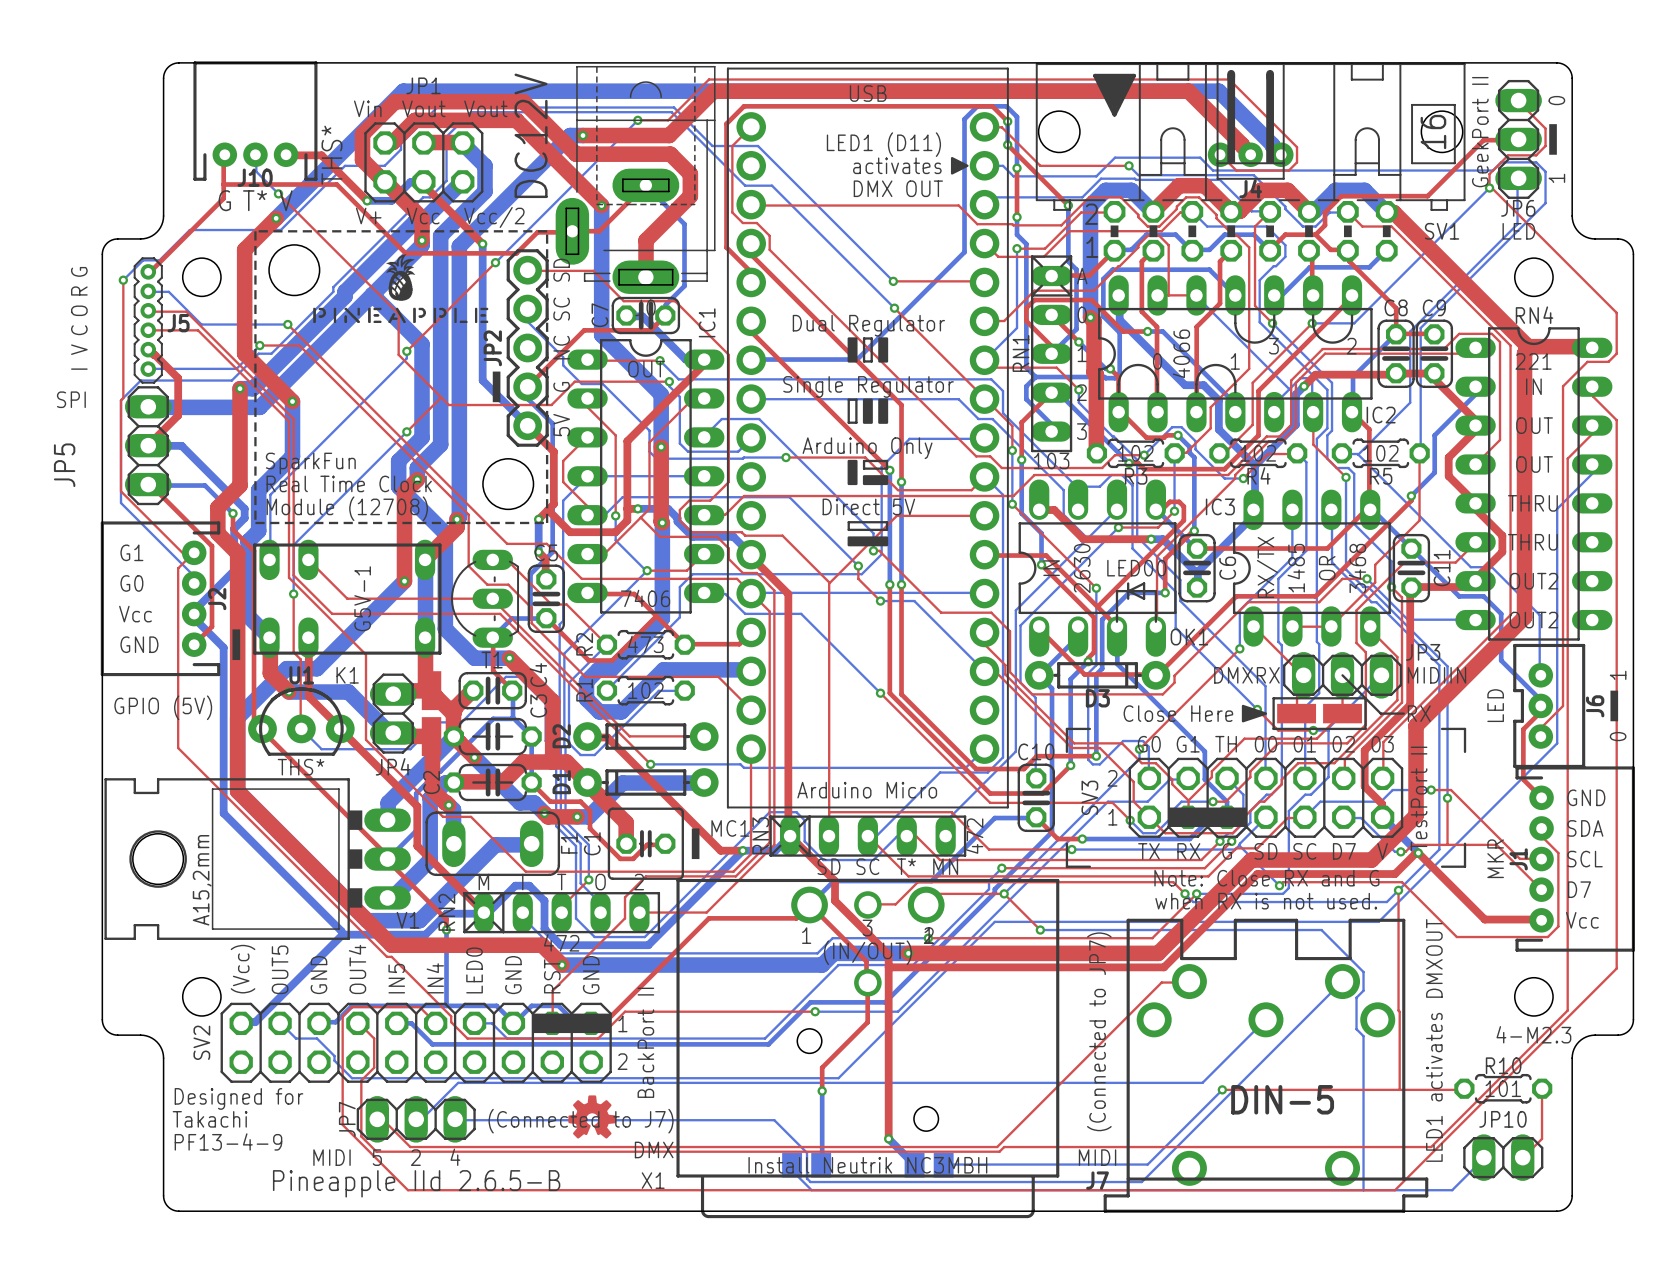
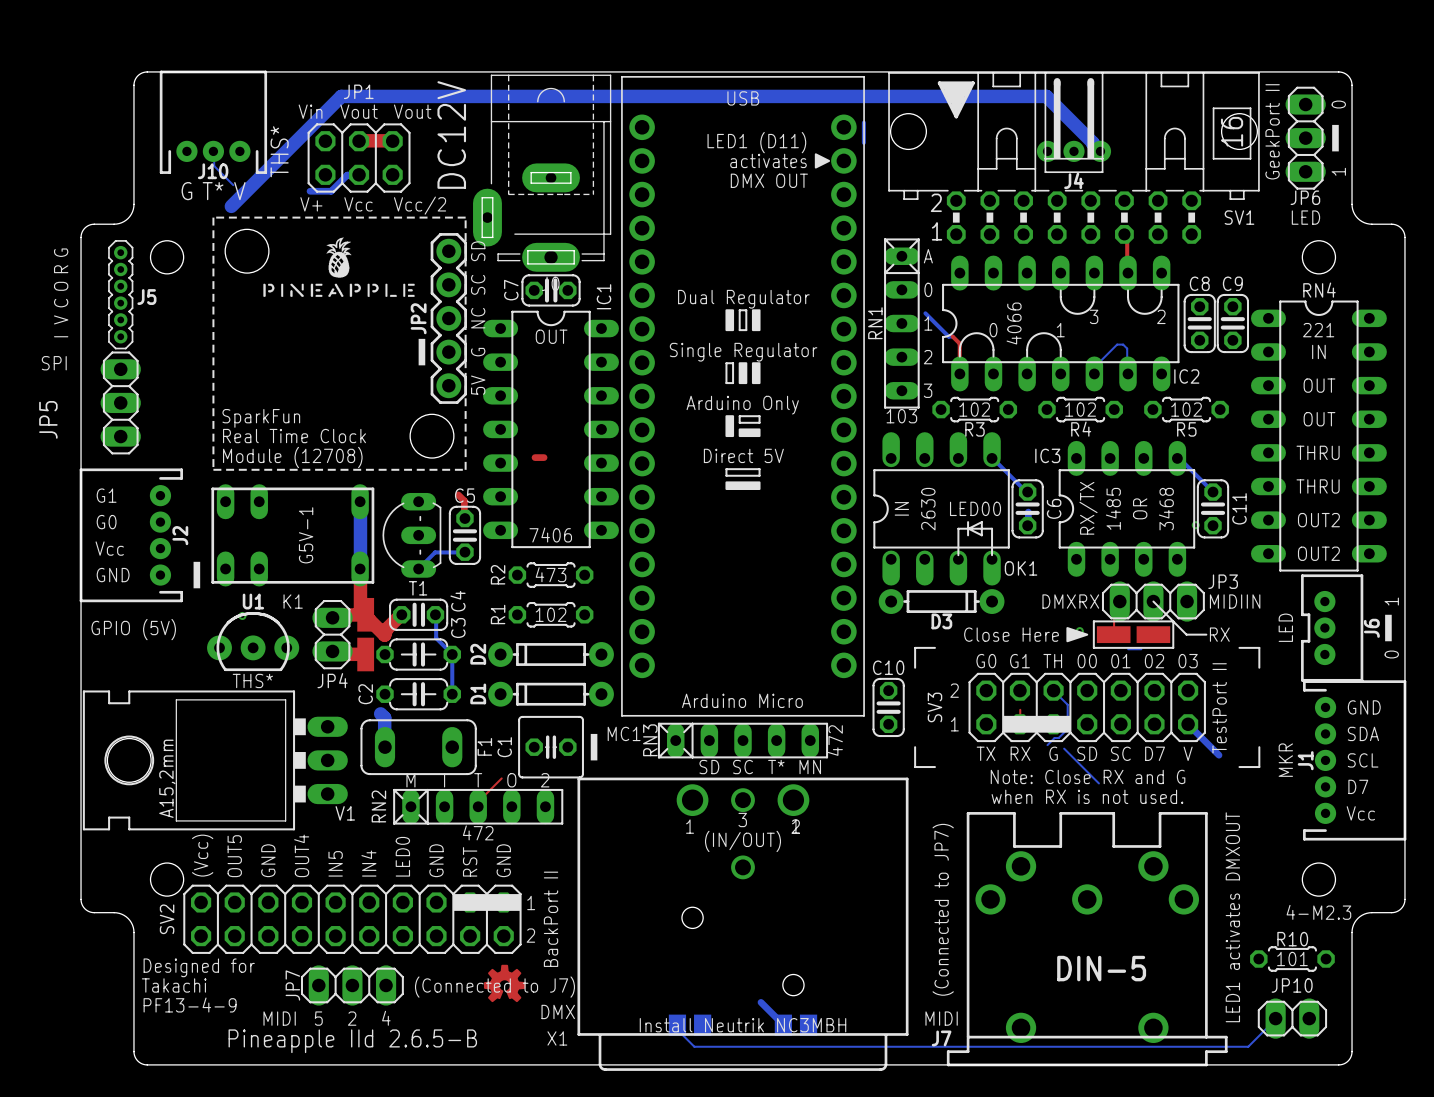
top track: (1518, 100) (1545, 128) (1545, 146) (1536, 155) (1508, 155) (1489, 174) (1489, 188) -> none
top track: (637, 120) (668, 120) (709, 79) (1229, 79) (1297, 147) (1297, 162) (1288, 170) (1236, 170) (1220, 154) -> none
bottom track: (637, 120) (495, 262) -> none
via: (637, 120) -> none
top track: (1007, 121) (992, 106) (744, 106) (726, 123) (726, 247) (751, 272) (751, 282) -> none
via: (1007, 121) -> none
top track: (751, 126) (732, 146) (732, 212) (742, 223) (756, 223) (769, 235) (769, 249) (976, 456) (990, 456) (1001, 468) (1102, 468) (1115, 455) (1144, 455) -> none
top track: (984, 126) (1001, 127) (1040, 165) (1129, 165) -> none
top track: (583, 135) (669, 135) (713, 91) (1188, 91) (1250, 154) -> none
bottom track: (583, 135) (570, 135) (459, 246) (459, 517) (457, 519) -> none
via: (583, 135) -> none
top track: (1518, 139) (1483, 140) (1427, 196) (1341, 196) (1325, 212) (1325, 225) (1315, 234) -> none
top track: (384, 142) (392, 142) (415, 120) (516, 120) (601, 205) -> none
bottom track: (462, 142) (485, 165) (485, 191) (440, 235) (440, 444) (417, 468) (417, 479) -> none
top track: (1007, 144) (1068, 205) -> none
via: (1007, 144) -> none
top track: (224, 154) (223, 198) (148, 271) -> none
top track: (286, 154) (321, 155) (367, 200) -> none
bottom track: (984, 165) (1003, 165) (1013, 176) (1096, 176) (1115, 157) (1200, 157) (1213, 170) (1493, 170) (1501, 162) (1536, 162) (1545, 171) (1545, 203) (1420, 328) (1419, 453) -> none
bottom track: (1129, 165) (1138, 175) (1253, 175) (1302, 226) (1315, 226) (1329, 212) (1347, 211) -> none
via: (1129, 165) -> none
top track: (1017, 168) (1017, 217) -> none
bottom track: (1017, 168) (1017, 116) (1006, 106) (977, 106) (964, 119) (964, 252) (857, 359) (751, 360) -> none
via: (1017, 168) -> none
bottom track: (1518, 178) (1517, 224) (1410, 331) (1410, 402) (1358, 454) -> none
top track: (423, 181) (424, 185) (482, 244) -> none
bottom track: (462, 181) (422, 221) (415, 221) (345, 291) (345, 296) (252, 388) (240, 388) -> none
top track: (223, 184) (336, 184) (405, 253) (516, 253) (537, 232) (572, 231) -> none
top track: (645, 185) (599, 231) (572, 231) -> none
bottom track: (645, 185) (684, 224) (684, 286) (665, 304) (665, 315) -> none
top track: (1489, 185) (1616, 312) (1616, 353) (1608, 361) (1587, 361) (1563, 386) (1563, 706) (1540, 728) (1540, 736) -> none
bottom track: (1489, 188) (1354, 323) (1312, 323) -> none
via: (1489, 188) -> none
top track: (278, 193) (398, 314) (398, 354) (448, 405) (551, 405) (574, 381) (669, 381) -> none
via: (278, 193) -> none
via: (367, 200) -> none
top track: (751, 204) (958, 205) (977, 224) (1061, 225) (1089, 197) (1120, 197) (1147, 226) (1159, 226) (1186, 197) (1199, 197) (1216, 214) (1216, 218) (1249, 247) (1249, 368) (1210, 407) (1210, 428) (1186, 452) (1174, 453) -> none
bottom track: (984, 204) (992, 197) (1082, 197) (1101, 178) (1220, 179) (1251, 211) (1270, 211) -> none
bottom track: (601, 205) (601, 335) (661, 394) (661, 447) -> none
via: (601, 205) -> none
bottom track: (1068, 205) (1068, 261) (1076, 269) (1076, 329) (1051, 353) -> none
via: (1068, 205) -> none
top track: (1114, 211) (1081, 212) (1045, 248) (1017, 248) -> none
top track: (1153, 211) (1179, 185) (1204, 185) (1231, 211) (1239, 211) (1260, 190) (1287, 190) (1308, 211) -> none
bottom track: (1153, 211) (1131, 190) (1105, 190) (1090, 205) (1090, 317) -> none
top track: (1192, 211) (1180, 212) (1161, 231) (1069, 231) (1043, 256) (998, 256) (984, 243) -> none
bottom track: (1192, 211) (1207, 226) (1266, 226) (1285, 245) (1285, 256) (1259, 280) (1259, 322) (1327, 389) (1327, 428) (1316, 438) (1316, 641) (1319, 644) (1319, 693) (1305, 707) (1304, 778) -> none
top track: (1270, 211) (1255, 226) (1255, 305) (1272, 323) -> none
bottom track: (1308, 211) (1314, 211) (1335, 190) (1364, 190) (1386, 211) -> none
top track: (1347, 211) (1362, 226) (1391, 226) (1510, 345) (1510, 615) (1383, 742) (1382, 778) -> none
top track: (1386, 211) (1393, 212) (1528, 346) -> none
bottom track: (1017, 217) (1017, 234) (1026, 244) (1026, 367) (1035, 377) -> none
via: (1017, 217) -> none
top track: (276, 218) (244, 249) (244, 353) (292, 401) -> none
via: (276, 218) -> none
top track: (1315, 234) (1330, 249) (1347, 249) (1349, 252) (1349, 261) (1396, 308) (1396, 334) (1434, 334) -> none
top track: (1315, 234) (1285, 234) (1270, 250) -> none
top track: (422, 240) (422, 218) (362, 160) (362, 134) (395, 101) (523, 101) (576, 154) (670, 154) (690, 174) (690, 196) (646, 240) (645, 277) -> none
bottom track: (422, 240) (422, 245) (259, 407) (148, 406) -> none
via: (422, 240) -> none
top track: (751, 243) (752, 255) (901, 405) (901, 482) -> none
bottom track: (482, 244) (482, 380) (527, 425) -> none
via: (482, 244) -> none
bottom track: (1017, 248) (1017, 328) (984, 360) -> none
via: (1017, 248) -> none
top track: (1114, 250) (1089, 275) (1051, 276) -> none
bottom track: (1114, 250) (1131, 249) (1146, 234) (1175, 234) (1192, 250) (1209, 249) (1224, 234) (1253, 234) (1270, 250) -> none
top track: (1153, 250) (1141, 261) (1141, 311) (1157, 326) (1157, 412) -> none
top track: (1231, 250) (1220, 261) (1220, 303) (1196, 326) (1196, 412) -> none
bottom track: (1386, 250) (1369, 267) (1309, 267) (1281, 295) (1274, 295) -> none
top track: (495, 262) (406, 351) -> none
via: (495, 262) -> none
top track: (527, 270) (593, 270) (623, 301) (675, 301) (728, 354) (728, 482) (710, 500) (689, 500) (679, 510) (679, 520) (691, 532) (741, 532) (745, 535) (782, 535) (829, 582) -> none
top track: (123, 280) (121, 491) (187, 557) (194, 552) (178, 568) (178, 748) (387, 956) (391, 956) (451, 1016) (451, 1022) (467, 1038) (598, 1038) (625, 1011) (815, 1011) -> none
bottom track: (123, 280) (143, 260) (159, 260) (189, 230) (280, 230) (345, 165) (384, 165) (401, 149) (401, 143) (437, 107) (674, 107) (712, 146) (758, 146) (893, 281) -> none
via: (123, 280) -> none
top track: (893, 281) (984, 282) -> none
via: (893, 281) -> none
bottom track: (148, 291) (168, 291) (201, 324) (287, 324) -> none
bottom track: (372, 294) (422, 344) (422, 437) (398, 461) (398, 486) (445, 533) (445, 629) (474, 658) (509, 658) -> none
bottom track: (1118, 295) (1119, 319) (1185, 385) (1203, 385) (1218, 400) (1218, 429) (1255, 465) -> none
top track: (1157, 295) (1196, 295) -> none
top track: (1168, 295) (1168, 245) (1159, 235) (1147, 235) (1094, 290) (1034, 290) (1004, 321) (984, 321) -> none
bottom track: (1196, 295) (1289, 389) -> none
bottom track: (1235, 295) (1209, 269) (1112, 269) (1103, 279) (1103, 316) (1119, 332) (1119, 373) (1115, 378) (1035, 377) -> none
top track: (1352, 295) (1258, 391) (1258, 435) (1224, 469) (1144, 469) (1138, 463) (1129, 463) -> none
top track: (894, 308) (1012, 426) (1012, 450) -> none
bottom track: (894, 308) (772, 185) (745, 185) (671, 112) (471, 112) (446, 136) (446, 181) (430, 197) (423, 197) (333, 287) (333, 291) (271, 353) (258, 353) (231, 380) (140, 380) (121, 400) (121, 503) (193, 575) (194, 583) -> none
via: (894, 308) -> none
bottom track: (527, 309) (528, 322) (563, 357) (563, 365) (581, 384) (602, 384) (649, 430) (649, 451) (656, 458) (786, 457) -> none
top track: (148, 310) (186, 311) (293, 419) (293, 575) (332, 613) (500, 613) (650, 764) -> none
top track: (1051, 314) (1078, 342) -> none
bottom track: (626, 315) (642, 316) (685, 359) (704, 359) -> none
top track: (665, 315) (650, 330) (584, 330) (527, 386) -> none
top track: (1090, 317) (1094, 321) (1096, 453) -> none
via: (1090, 317) -> none
top track: (751, 321) (752, 332) (889, 470) -> none
bottom track: (1272, 323) (1332, 382) (1332, 430) (1327, 435) (1327, 458) (1336, 468) (1348, 468) (1354, 473) (1354, 524) (1391, 561) (1391, 587) -> none
via: (1272, 323) -> none
top track: (1312, 323) (1252, 382) (1252, 424) (1224, 452) (1219, 453) -> none
via: (1312, 323) -> none
top track: (287, 324) (507, 543) (546, 543) (581, 578) (737, 578) (769, 611) (769, 842) (735, 876) (646, 876) (625, 897) (625, 918) (552, 990) (552, 1023) -> none
via: (287, 324) -> none
top track: (148, 330) (198, 330) (289, 421) (289, 577) (366, 654) (366, 739) (443, 816) (471, 816) (525, 871) (733, 871) (751, 854) (751, 749) -> none
top track: (1147, 331) (1123, 331) (1091, 300) (1034, 300) (1026, 308) (1026, 321) (1050, 345) (1051, 353) -> none
bottom track: (1147, 331) (1162, 331) (1235, 403) (1235, 412) -> none
via: (1147, 331) -> none
bottom track: (1396, 334) (1353, 377) (1352, 412) -> none
via: (1078, 342) -> none
top track: (259, 345) (299, 345) (468, 514) (468, 566) (487, 584) (508, 584) (531, 608) (531, 623) (585, 676) (718, 676) (751, 710) -> none
bottom track: (259, 345) (236, 368) (148, 369) -> none
via: (259, 345) -> none
top track: (1528, 346) (1592, 347) -> none
top track: (1528, 346) (1524, 353) (1524, 617) (1416, 725) (1416, 815) (1371, 860) (1251, 860) (1158, 953) (908, 953) -> none
top track: (1475, 347) (1469, 353) (1325, 353) (1295, 382) (1295, 427) (1281, 441) (1269, 441) (1235, 475) (1235, 478) (1157, 556) (1155, 626) -> none
top track: (148, 349) (178, 378) (178, 415) (148, 445) -> none
bottom track: (406, 351) (406, 358) (270, 494) (269, 559) -> none
via: (406, 351) -> none
top track: (587, 359) (660, 360) -> none
top track: (704, 359) (703, 365) (627, 441) (627, 520) (615, 532) (570, 532) (548, 510) -> none
bottom track: (660, 360) (678, 379) (991, 379) (1003, 391) (1003, 413) (1077, 487) (1078, 509) (1077, 486) (1099, 486) (1111, 475) (1122, 475) (1132, 485) (1132, 548) (1175, 591) (1175, 627) (1257, 709) -> none
via: (660, 360) -> none
top track: (984, 360) (992, 367) (1056, 367) (1078, 389) -> none
via: (1110, 368) -> none
top track: (1396, 373) (1315, 374) (1304, 386) -> none
top track: (1396, 373) (1434, 373) (1432, 377) (1475, 420) (1474, 431) (1448, 457) (1448, 476) (1476, 504) (1476, 510) (1502, 535) (1502, 552) (1469, 587) (1411, 587) (1410, 704) (1364, 750) (1364, 786) (1382, 804) (1382, 817) -> none
bottom track: (1035, 377) (1026, 386) (1026, 399) (1050, 423) (1051, 431) -> none
bottom track: (669, 381) (669, 386) (679, 396) (679, 443) (688, 451) (738, 451) (751, 438) -> none
via: (669, 381) -> none
bottom track: (527, 386) (528, 399) (552, 423) (552, 552) (530, 574) (530, 618) -> none
bottom track: (1304, 386) (1295, 394) (1295, 424) (1255, 465) -> none
via: (1304, 386) -> none
bottom track: (1475, 386) (1475, 394) (1434, 435) (1434, 472) (1411, 496) -> none
top track: (1592, 386) (1593, 396) (1616, 420) (1616, 968) (1395, 1190) (408, 1190) (342, 1124) (342, 1016) (352, 1007) (419, 1007) (435, 1023) -> none
top track: (240, 388) (240, 485) (217, 507) (217, 533) (237, 553) (237, 791) (391, 945) (542, 945) (562, 965) -> none
via: (240, 388) -> none
bottom track: (1078, 389) (1078, 402) (1137, 459) (1137, 536) (1180, 580) (1180, 601) (1265, 686) (1265, 778) -> none
via: (1078, 389) -> none
top track: (1051, 392) (1021, 422) (1021, 459) -> none
bottom track: (1051, 392) (1059, 393) (1129, 463) -> none
top track: (441, 397) (406, 431) -> none
top track: (587, 398) (587, 407) (615, 435) (615, 515) -> none
top track: (704, 398) (692, 399) (649, 442) (649, 508) (605, 553) (587, 554) -> none
bottom track: (751, 399) (958, 399) (978, 419) (992, 419) (1063, 490) (1063, 514) (1087, 538) -> none
bottom track: (292, 401) (292, 456) (258, 490) (258, 531) (248, 541) (248, 616) (269, 637) -> none
via: (292, 401) -> none
top track: (1118, 412) (1120, 412) (1146, 437) (1178, 435) -> none
top track: (1313, 412) (1313, 444) (1346, 477) -> none
top track: (1352, 412) (1369, 429) (1370, 509) (1367, 508) (1327, 548) (1197, 548) -> none
top track: (527, 425) (553, 451) (553, 504) (538, 519) -> none
top track: (1592, 425) (1592, 434) (1567, 458) (1567, 1010) (1431, 1147) (1004, 1147) (999, 1151) (376, 1151) (361, 1136) (361, 1080) (374, 1067) (374, 1038) (357, 1023) -> none
bottom track: (406, 431) (293, 545) (293, 594) -> none
via: (406, 431) -> none
bottom track: (1178, 435) (1189, 447) (1189, 452) (1194, 457) (1194, 531) -> none
via: (1178, 435) -> none
top track: (587, 437) (563, 461) (563, 482) (586, 505) (587, 515) -> none
bottom track: (704, 437) (721, 419) (759, 419) (873, 533) (873, 550) -> none
bottom track: (984, 438) (909, 438) (881, 466) (881, 554) (861, 574) (692, 574) (679, 587) (679, 617) (606, 690) -> none
bottom track: (148, 445) (181, 445) (244, 508) (244, 518) (234, 528) (234, 570) (194, 610) (194, 614) (195, 619) (223, 647) (223, 813) (341, 931) (342, 934) -> none
top track: (661, 447) (662, 522) -> none
via: (661, 447) -> none
bottom track: (1012, 450) (1012, 504) -> none
via: (1012, 450) -> none
bottom track: (1174, 453) (1174, 511) -> none
top track: (1297, 453) (1267, 454) (1243, 478) -> none
bottom track: (1297, 453) (1306, 462) (1306, 550) (1278, 578) (1278, 641) (1281, 645) (1281, 784) (1271, 794) (1266, 794) (1250, 811) (1250, 822) (1231, 841) -> none
bottom track: (1341, 453) (1357, 454) (1470, 567) (1491, 567) (1539, 615) (1540, 675) -> none
top track: (1419, 453) (1419, 520) (1375, 564) (1375, 582) (1331, 626) (1292, 626) -> none
bottom track: (1144, 455) (1172, 427) (1181, 427) (1195, 441) (1195, 449) (1224, 478) (1243, 478) -> none
via: (1144, 455) -> none
top track: (786, 457) (865, 457) (898, 490) (971, 490) (984, 476) -> none
via: (786, 457) -> none
bottom track: (1021, 459) (1021, 513) (1041, 533) (1041, 564) -> none
via: (1021, 459) -> none
via: (1129, 463) -> none
top track: (1475, 464) (1500, 440) (1500, 342) (1491, 333) (1459, 333) (1444, 349) (1322, 349) (1291, 380) (1291, 424) (1279, 436) (1266, 436) (1228, 475) (1034, 475) (1013, 496) (744, 496) (725, 514) (704, 515) -> none
bottom track: (1592, 464) (1592, 473) (1557, 508) (1557, 743) (1378, 921) (994, 921) (838, 1078) (352, 1078) (334, 1060) (334, 1056) (317, 1038) (296, 1038) (280, 1023) -> none
bottom track: (1255, 465) (1255, 506) (1252, 510) (1252, 517) (1197, 571) (1194, 570) (1162, 539) (1151, 539) -> none
bottom track: (889, 470) (889, 584) -> none
via: (889, 470) -> none
bottom track: (587, 476) (704, 476) -> none
bottom track: (587, 476) (563, 500) (563, 620) (559, 624) (560, 823) (580, 843) (580, 883) (600, 903) (600, 912) -> none
bottom track: (984, 476) (1003, 494) (1003, 757) (987, 772) (940, 772) (877, 835) (867, 836) -> none
bottom track: (1346, 477) (1346, 569) (1363, 587) (1368, 587) (1447, 666) (1447, 798) -> none
via: (1346, 477) -> none
via: (1243, 478) -> none
top track: (417, 479) (404, 492) (404, 581) -> none
via: (417, 479) -> none
bottom track: (901, 482) (901, 584) -> none
via: (901, 482) -> none
top track: (148, 484) (212, 546) (212, 626) (194, 644) -> none
bottom track: (148, 484) (205, 485) (233, 513) -> none
top track: (1411, 496) (1411, 500) (1315, 596) (1236, 596) (1158, 674) (1084, 674) (1040, 630) (1039, 626) -> none
via: (1411, 496) -> none
top track: (1012, 504) (1096, 588) -> none
via: (1012, 504) -> none
bottom track: (637, 508) (668, 508) (692, 536) (733, 536) (751, 554) -> none
via: (637, 508) -> none
top track: (1039, 509) (1054, 510) (1083, 539) (1151, 539) -> none
bottom track: (1116, 509) (1015, 610) (1015, 751) (945, 821) (945, 836) -> none
top track: (1155, 509) (1162, 508) (1169, 501) (1179, 501) (1183, 506) (1183, 520) (1097, 606) -> none
bottom track: (1331, 509) (1332, 562) (1371, 602) (1376, 602) (1439, 665) (1439, 849) (1386, 902) (1193, 902) (1185, 893) -> none
bottom track: (1292, 510) (1292, 557) (1239, 610) (1239, 648) -> none
top track: (1174, 511) (1158, 527) (1118, 527) -> none
via: (1174, 511) -> none
top track: (233, 513) (233, 529) (254, 550) (254, 720) (263, 731) (387, 855) (388, 861) (446, 919) (446, 930) -> none
via: (233, 513) -> none
bottom track: (587, 515) (605, 514) (622, 497) (789, 497) (858, 566) -> none
bottom track: (615, 515) (615, 540) (647, 570) (564, 653) (565, 821) (588, 844) (588, 879) -> none
via: (615, 515) -> none
top track: (984, 515) (896, 515) (829, 583) (828, 836) -> none
top track: (640, 517) (660, 536) (717, 536) (728, 548) (728, 559) (742, 573) (756, 573) (774, 590) (774, 844) (706, 912) (639, 912) -> none
top track: (457, 519) (457, 527) (425, 559) -> none
via: (457, 519) -> none
bottom track: (538, 519) (538, 552) -> none
via: (538, 519) -> none
bottom track: (662, 522) (662, 618) (611, 669) (598, 669) (586, 681) (586, 699) (599, 711) (621, 711) (663, 669) (751, 671) -> none
via: (662, 522) -> none
bottom track: (1118, 527) (1020, 625) (1020, 682) (1035, 697) (1036, 778) -> none
via: (1118, 527) -> none
top track: (1194, 531) (1165, 559) (1165, 592) -> none
via: (1194, 531) -> none
via: (1151, 539) -> none
top track: (1475, 542) (1455, 562) (1404, 562) (1356, 610) (1356, 643) (1365, 652) (1365, 724) (1347, 743) (1278, 743) (1250, 771) (1250, 777) (1225, 801) (1213, 801) -> none
bottom track: (1411, 548) (1459, 596) (1483, 596) (1501, 613) (1501, 660) (1539, 699) (1540, 705) -> none
top track: (873, 550) (879, 550) (941, 612) (991, 612) (1010, 631) (1010, 672) (1032, 694) (1162, 694) (1174, 682) (1174, 675) (1248, 602) (1319, 602) (1342, 578) (1367, 578) -> none
via: (873, 550) -> none
via: (538, 552) -> none
top track: (704, 554) (686, 570) (647, 570) -> none
top track: (751, 554) (788, 594) (788, 833) (835, 881) (835, 900) (888, 954) (888, 1138) -> none
top track: (984, 554) (1046, 555) (1116, 626) -> none
top track: (308, 559) (347, 598) (492, 598) (629, 736) (704, 736) -> none
top track: (492, 559) (507, 560) (551, 604) (566, 604) (606, 644) -> none
top track: (1041, 564) (1094, 617) (1094, 652) (1088, 658) (1088, 661) -> none
via: (1041, 564) -> none
top track: (858, 566) (858, 578) (880, 601) -> none
via: (858, 566) -> none
via: (647, 570) -> none
bottom track: (1367, 578) (1407, 619) (1475, 620) -> none
via: (1367, 578) -> none
bottom track: (404, 581) (317, 668) (286, 668) (237, 717) (237, 791) (367, 920) (419, 920) (495, 844) (531, 843) -> none
via: (404, 581) -> none
top track: (889, 584) (889, 693) (990, 793) (1042, 793) (1070, 765) -> none
via: (889, 584) -> none
top track: (901, 584) (901, 694) (976, 769) (1024, 769) (1036, 756) (1096, 756) -> none
via: (901, 584) -> none
top track: (1391, 587) (1402, 597) (1402, 702) (1344, 759) (1343, 778) -> none
bottom track: (1096, 588) (1096, 665) (1088, 673) (1088, 759) (1092, 764) (1099, 764) (1123, 741) (1143, 741) (1148, 746) (1149, 778) -> none
via: (1096, 588) -> none
top track: (587, 592) (634, 594) (684, 644) (739, 644) (751, 632) -> none
bottom track: (704, 592) (725, 594) (745, 613) (801, 613) (880, 693) -> none
bottom track: (1165, 592) (1129, 592) (1102, 619) (1102, 668) (1096, 674) (1096, 756) -> none
via: (1165, 592) -> none
bottom track: (751, 593) (984, 593) -> none
top track: (293, 594) (293, 652) (300, 659) (301, 728) -> none
via: (293, 594) -> none
bottom track: (880, 601) (914, 601) (984, 671) -> none
via: (880, 601) -> none
top track: (656, 616) (612, 660) (588, 660) (546, 618) -> none
bottom track: (1078, 626) (1077, 637) (1039, 675) (1052, 688) (1052, 832) (994, 889) (994, 892) (885, 1002) (810, 1002) (768, 1044) (432, 1044) (411, 1023) (396, 1023) -> none
bottom track: (1116, 626) (1117, 664) (1204, 751) (1204, 779) (1227, 801) (1227, 817) (1211, 816) (1189, 839) (1082, 839) -> none
top track: (1253, 626) (1303, 675) -> none
top track: (1370, 626) (1370, 630) (1397, 657) (1397, 700) (1334, 763) (1298, 763) (1281, 779) (1281, 784) (1264, 801) (1259, 801) (1243, 818) (1243, 822) (1232, 833) (1165, 833) (1133, 801) (1133, 781) (1099, 748) (1071, 748) (996, 672) (984, 671) -> none
top track: (984, 632) (985, 645) (1005, 665) (1005, 674) (1074, 743) (1122, 743) (1141, 763) (1155, 763) (1172, 779) (1172, 784) (1188, 800) (1211, 777) (1211, 771) (1244, 738) (1316, 738) (1342, 713) (1342, 675) -> none
top track: (269, 637) (270, 673) (289, 692) -> none
top track: (308, 637) (308, 696) (417, 806) (417, 846) (483, 912) -> none
top track: (492, 637) (493, 671) (512, 690) -> none
bottom track: (606, 644) (569, 682) (569, 743) (580, 755) (594, 755) (658, 690) (684, 690) -> none
top track: (1239, 648) (1139, 749) -> none
via: (1239, 648) -> none
top track: (509, 658) (552, 701) (552, 762) -> none
via: (509, 658) -> none
bottom track: (1088, 661) (1070, 679) (1070, 765) -> none
via: (1088, 661) -> none
bottom track: (1381, 675) (1328, 728) (1328, 777) (1311, 794) (1305, 794) (1288, 811) (1288, 888) (1283, 893) (1196, 893) -> none
bottom track: (289, 692) (348, 692) (389, 732) (393, 733) -> none
top track: (880, 693) (990, 802) (1112, 802) (1130, 820) -> none
via: (880, 693) -> none
top track: (1540, 705) (1539, 713) (1523, 729) (1523, 779) (1541, 797) -> none
top track: (1257, 709) (1278, 730) (1313, 730) -> none
top track: (453, 714) (453, 736) (474, 757) -> none
bottom track: (513, 717) (493, 718) (416, 793) (416, 830) (387, 859) -> none
bottom track: (301, 728) (321, 749) (410, 749) (437, 722) (461, 722) (506, 676) (518, 676) (545, 703) (545, 741) (556, 751) (556, 826) (576, 846) (576, 918) (594, 937) (644, 937) (769, 812) (796, 812) (804, 820) (804, 841) (823, 860) (873, 860) (896, 836) (906, 836) -> none
via: (1313, 730) -> none
top track: (431, 736) (432, 790) (448, 805) -> none
bottom track: (453, 736) (388, 802) (387, 820) -> none
top track: (587, 736) (607, 737) (720, 850) (742, 850) -> none
bottom track: (984, 749) (965, 767) (744, 767) (740, 764) (650, 764) -> none
bottom track: (1139, 749) (1139, 758) (1004, 893) -> none
via: (1139, 749) -> none
via: (1096, 756) -> none
bottom track: (474, 757) (520, 802) (534, 802) (544, 813) -> none
via: (474, 757) -> none
via: (650, 764) -> none
via: (1070, 765) -> none
bottom track: (1188, 778) (1169, 779) (1147, 801) (1108, 801) (898, 1011) (815, 1011) -> none
top track: (453, 782) (503, 781) (523, 762) (566, 762) (626, 822) (626, 843) -> none
bottom track: (453, 782) (445, 783) (430, 798) (430, 860) (392, 897) (387, 897) -> none
top track: (531, 782) (550, 801) (580, 801) (590, 811) (590, 828) (620, 858) (633, 858) (647, 844) (665, 843) -> none
bottom track: (704, 782) (622, 783) (588, 816) (577, 816) -> none
top track: (1431, 790) (1451, 790) (1519, 858) (1541, 859) -> none
bottom track: (1431, 790) (1392, 790) (1381, 801) (1320, 801) (1304, 817) -> none
via: (1431, 790) -> none
top track: (1447, 798) (1447, 844) -> none
via: (1447, 798) -> none
bottom track: (1213, 801) (1181, 801) (1172, 811) (1172, 816) (1155, 833) (1143, 833) (1130, 820) -> none
via: (1213, 801) -> none
via: (448, 805) -> none
top track: (829, 812) (951, 812) (989, 849) (1071, 849) -> none
top track: (544, 813) (548, 816) (577, 816) -> none
via: (544, 813) -> none
via: (577, 816) -> none
top track: (1036, 817) (1057, 839) (1082, 839) -> none
bottom track: (1036, 817) (994, 818) (931, 881) (833, 881) (809, 904) -> none
bottom track: (1265, 817) (1235, 849) (1071, 849) -> none
top track: (1304, 817) (1287, 818) (1257, 848) (1236, 848) (1208, 876) (908, 876) (867, 836) -> none
bottom track: (1343, 817) (1361, 818) (1395, 851) (1400, 851) -> none
via: (1130, 820) -> none
top track: (1541, 828) (1542, 836) (1558, 853) (1558, 926) (1547, 937) (1456, 937) (1402, 882) (1283, 882) (1279, 885) -> none
bottom track: (790, 836) (775, 850) (742, 850) (648, 945) (560, 945) (544, 928) (544, 900) (529, 885) (515, 885) (489, 911) (483, 913) (446, 913) (425, 934) (342, 934) -> none
top track: (906, 836) (916, 836) (940, 860) (1201, 860) (1220, 841) -> none
via: (1082, 839) -> none
via: (1220, 841) -> none
top track: (1231, 841) (1204, 868) (1001, 868) -> none
via: (1231, 841) -> none
via: (1071, 849) -> none
via: (742, 850) -> none
top track: (1400, 851) (1405, 851) (1412, 844) (1496, 844) (1541, 889) -> none
via: (1400, 851) -> none
via: (1418, 853) -> none
bottom track: (1001, 868) (989, 881) (989, 889) (913, 965) (838, 965) (765, 1038) (507, 1038) (492, 1023) (474, 1023) -> none
via: (1001, 868) -> none
via: (588, 879) -> none
via: (1279, 885) -> none
top track: (1398, 890) (1399, 1089) -> none
via: (1398, 890) -> none
via: (1004, 893) -> none
top track: (1185, 893) (1173, 882) (917, 882) (895, 904) (867, 904) -> none
via: (1185, 893) -> none
top track: (1196, 893) (1152, 938) (928, 938) -> none
via: (1196, 893) -> none
top track: (926, 904) (937, 893) (1004, 893) (1040, 930) -> none
bottom track: (522, 912) (523, 918) (558, 953) (817, 953) (832, 938) (928, 938) -> none
top track: (1541, 920) (1484, 919) (1418, 853) (1395, 874) (1257, 874) (1164, 967) (888, 967) -> none
bottom track: (446, 930) (446, 1005) -> none
via: (446, 930) -> none
bottom track: (1040, 930) (1321, 930) (1363, 972) (1363, 990) (1356, 997) (1356, 1029) (1363, 1036) (1363, 1190) -> none
via: (1040, 930) -> none
bottom track: (342, 934) (255, 1022) (241, 1023) -> none
via: (928, 938) -> none
bottom track: (908, 953) (833, 953) (822, 965) (562, 965) -> none
via: (908, 953) -> none
via: (562, 965) -> none
top track: (1189, 981) (1161, 982) (997, 1147) (410, 1147) (383, 1120) (377, 1119) -> none
bottom track: (1342, 981) (1141, 1182) (810, 1182) (807, 1178) (807, 1152) (774, 1120) (455, 1119) -> none
via: (815, 1011) -> none
bottom track: (1265, 1019) (1202, 1082) (458, 1082) (422, 1119) (416, 1119) -> none
bottom track: (318, 1023) (335, 1022) (352, 1005) (496, 1005) (513, 1023) (531, 1005) (558, 1005) (574, 1022) (591, 1023) -> none
top track: (591, 1023) (605, 1022) (709, 918) (796, 918) (809, 904) (866, 961) (867, 1022) (822, 1067) (822, 1091) -> none
top track: (1464, 1088) (1222, 1089) -> none
top track: (1542, 1088) (1542, 1138) (1522, 1157) -> none
bottom track: (1222, 1089) (1147, 1164) (943, 1165) -> none
via: (1222, 1089) -> none
bottom track: (822, 1091) (821, 1165) -> none
via: (822, 1091) -> none
via: (888, 1138) -> none

